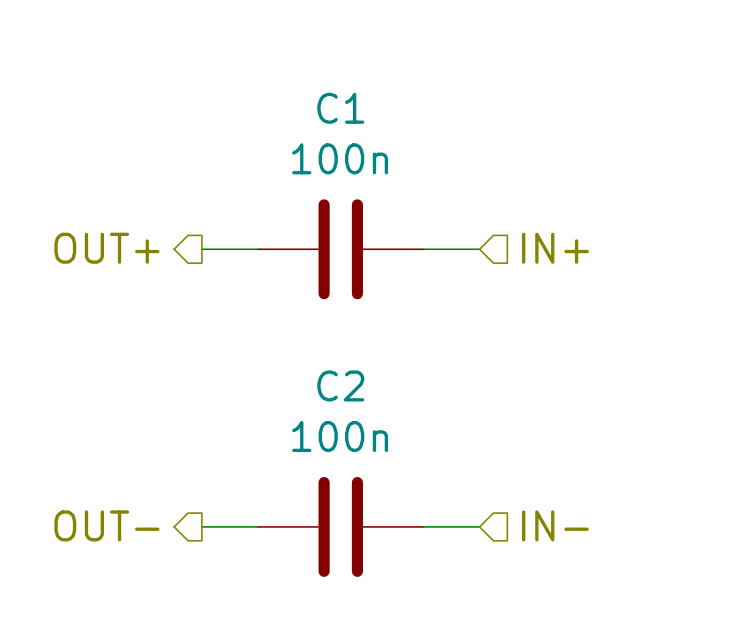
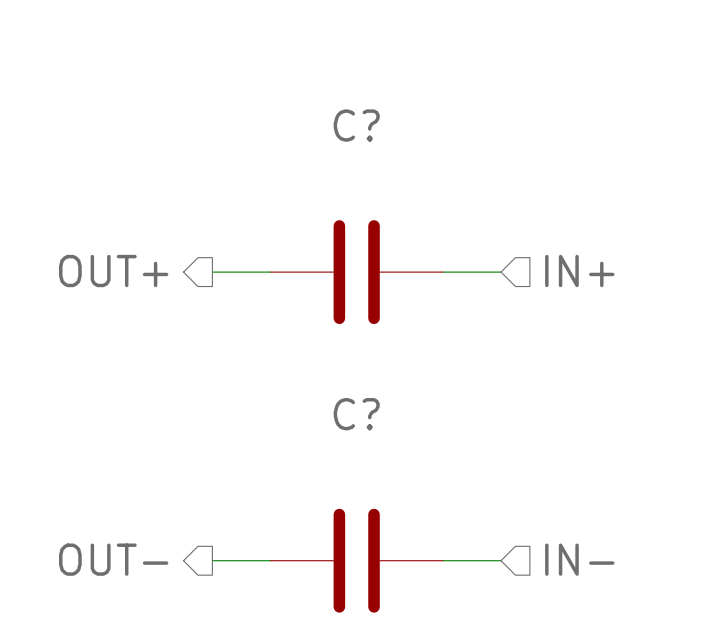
C1 name: C1 (340, 108) -> C? (356, 125)
C1 value: 100n (340, 158) -> none
C2 name: C2 (340, 385) -> C? (356, 414)
C2 value: 100n (340, 436) -> none

